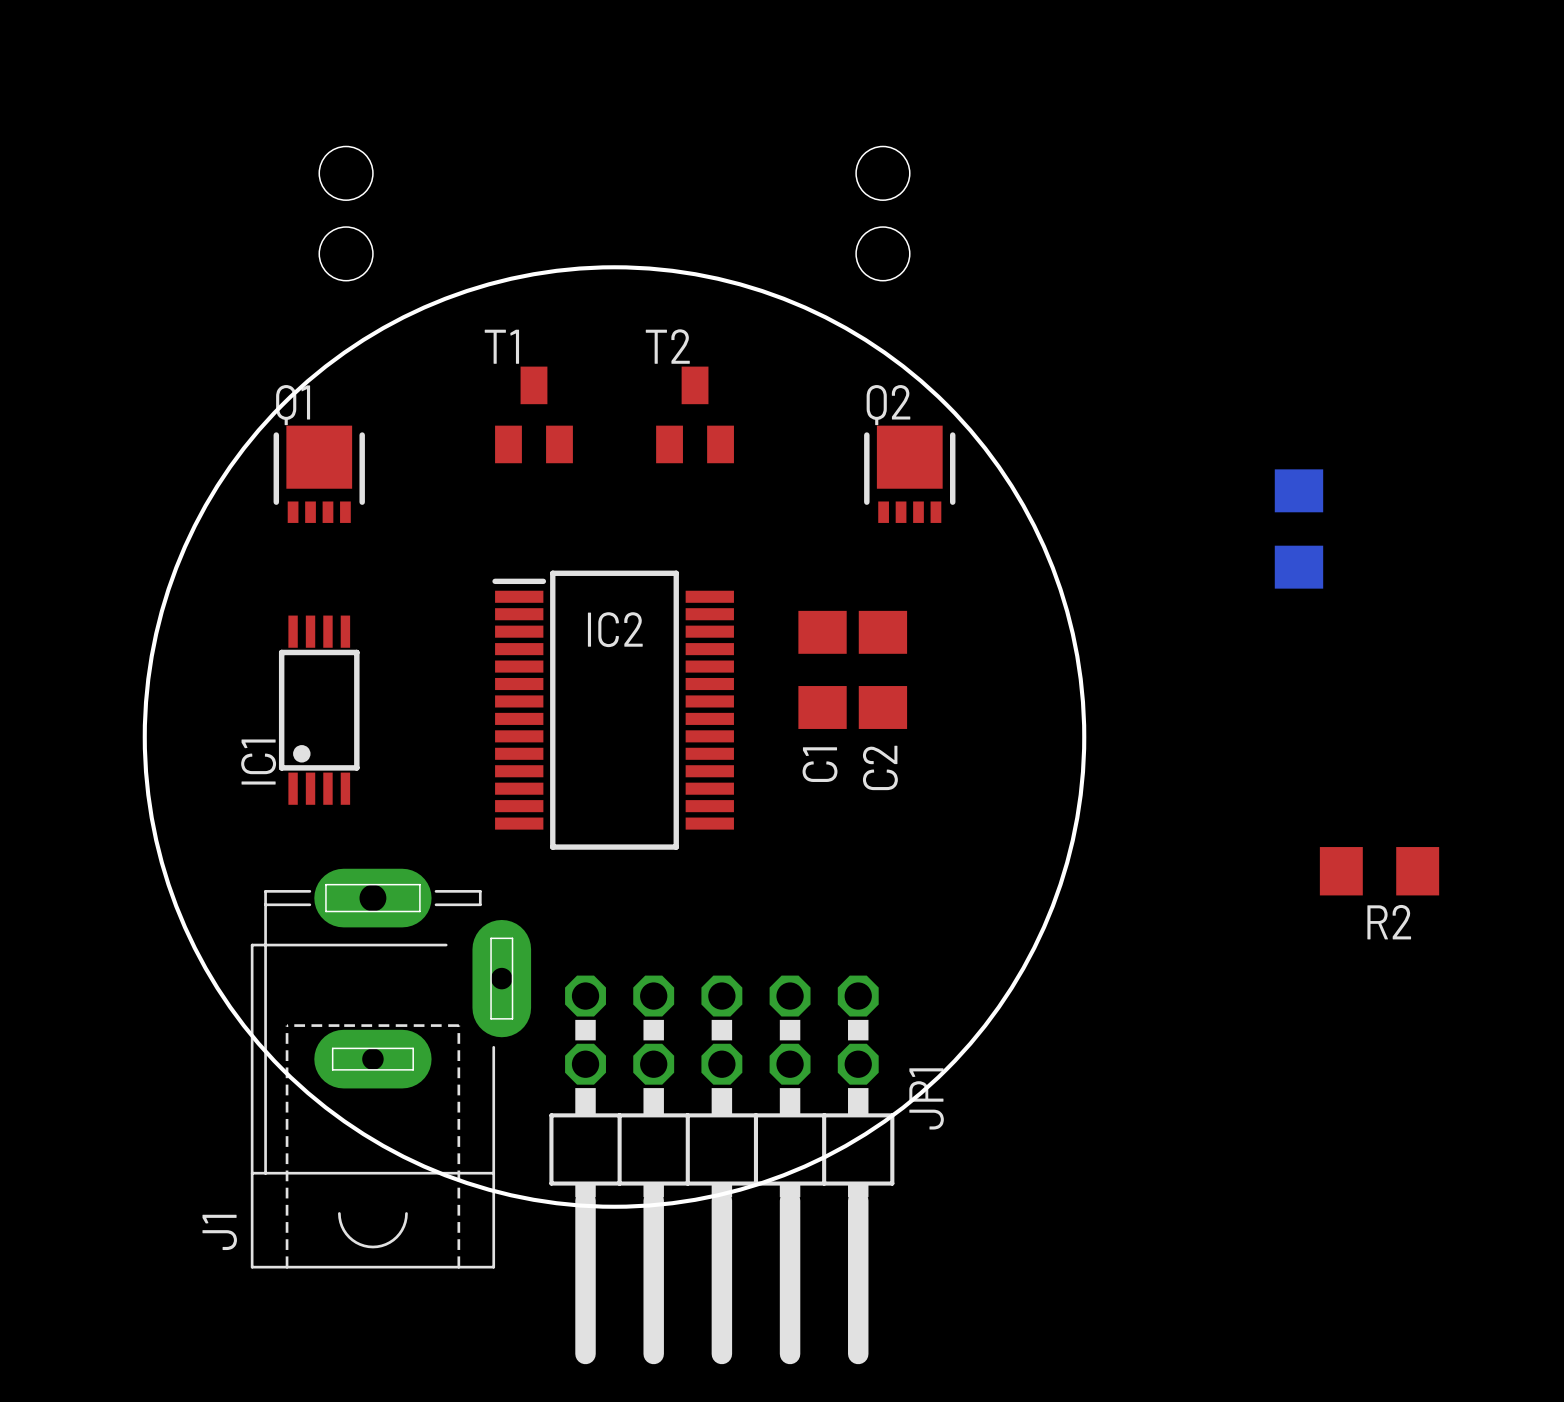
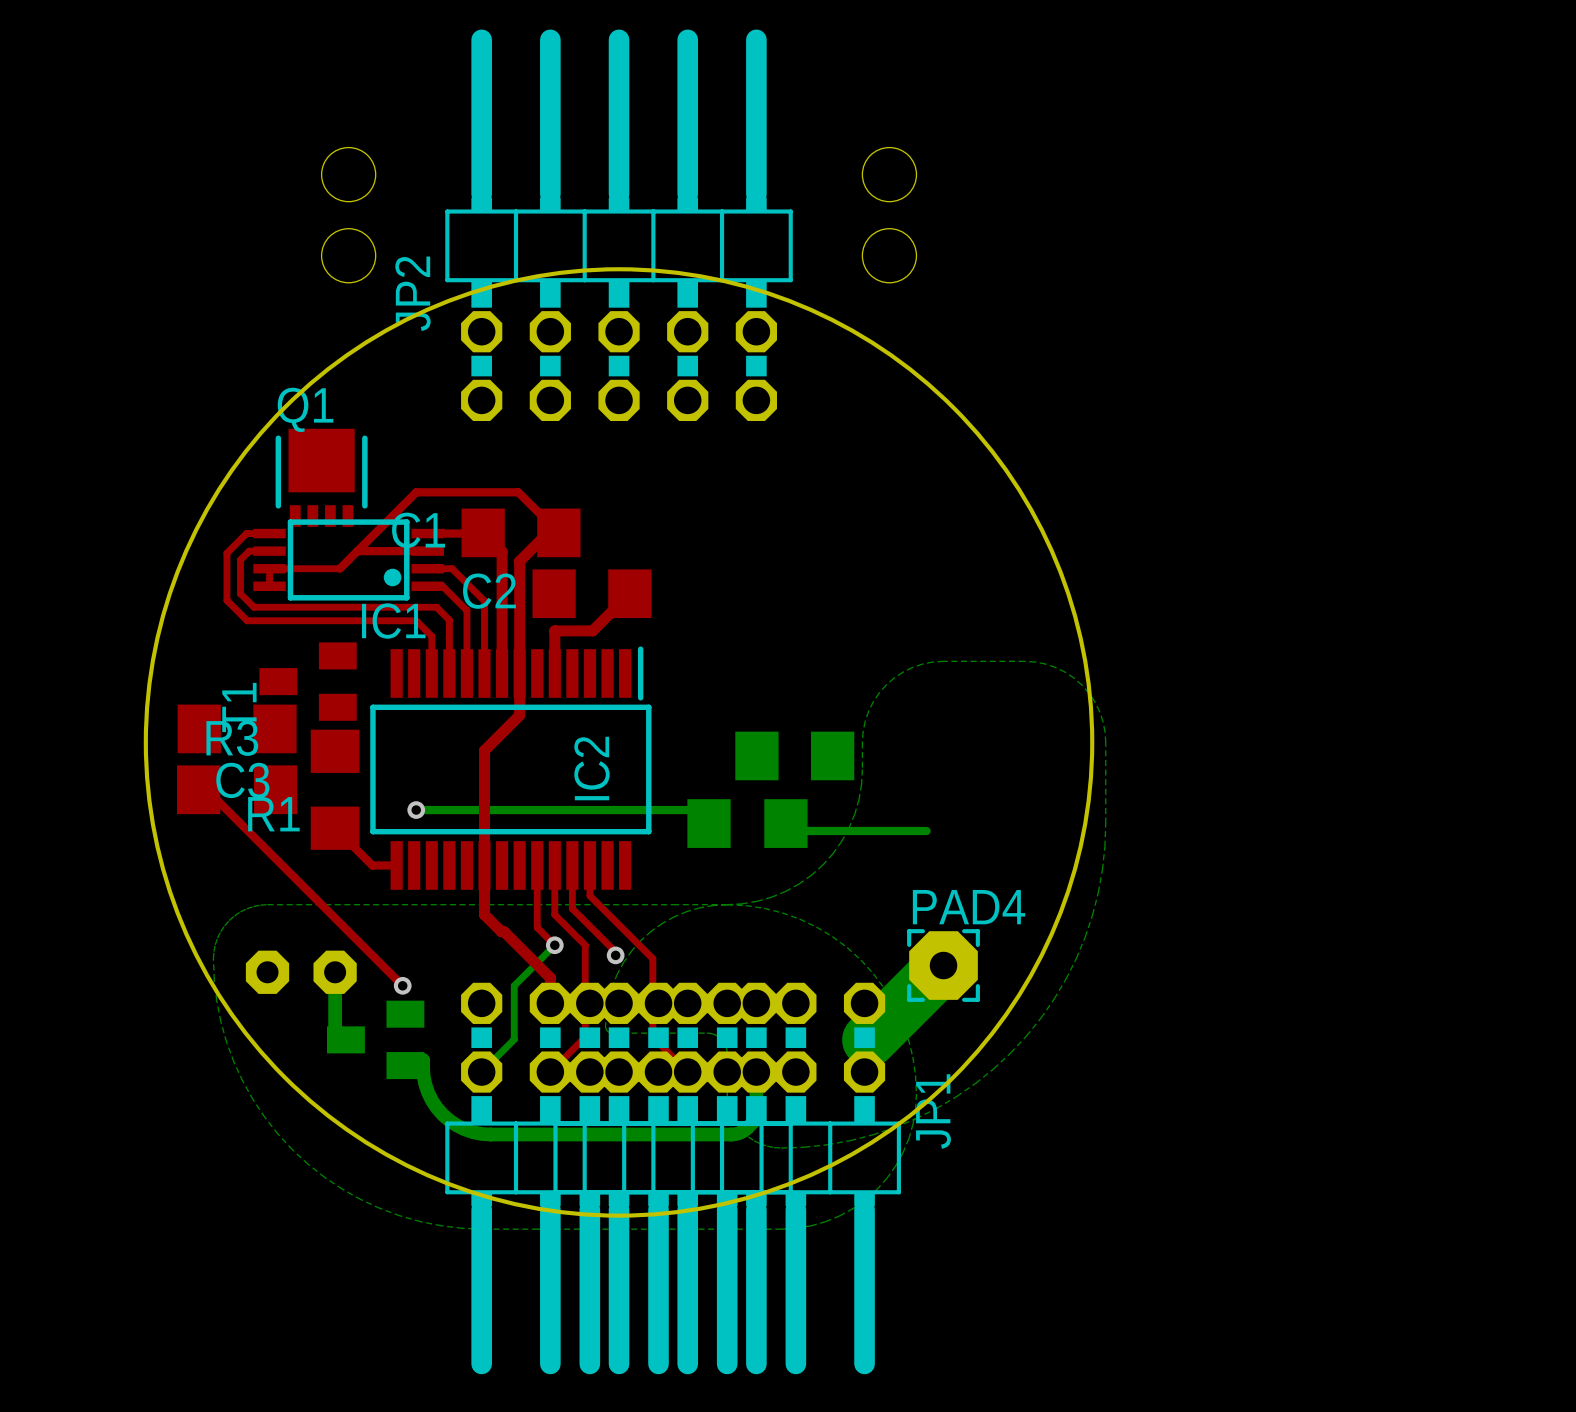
JP2: none -> (619, 225)
T1 rotation: 0° (533, 414) -> 90° counterclockwise (308, 681)
T1 position: (533, 414) -> (308, 681)
T2: (695, 414) -> none
Q2: (909, 474) -> none
part: (1298, 528) -> none
top track: none -> (269, 533) (246, 533) (226, 553) (226, 600) (247, 620) (416, 620) (431, 636) (431, 673)
top track: none -> (427, 533) (483, 532) (502, 551) (502, 673)
top track: none -> (269, 551) (249, 551) (240, 559) (240, 593) (254, 607) (436, 607) (449, 620) (449, 673)
top track: none -> (357, 551) (427, 551)
top track: none -> (427, 568) (452, 568) (484, 601) (484, 673)
top track: none -> (269, 586) (269, 568) (339, 568) (416, 492) (518, 492) (558, 532) (548, 532) (519, 561) (519, 715) (484, 750) (484, 914) (550, 977) (550, 1003)
top track: none -> (427, 586) (442, 586) (466, 610) (466, 673)
top track: none -> (629, 593) (592, 630) (554, 630) (554, 673)
bottom zone outline: none -> (943, 661) (1024, 661) (1045, 664) (1074, 678) (1094, 701) (1105, 731) (1104, 846) (1098, 892) (1085, 936) (1066, 979) (1041, 1018) (1010, 1053) (993, 1068) (956, 1096) (916, 1118) (894, 1127) (850, 1140) (804, 1147) (774, 1147) (760, 1143) (743, 1132) (731, 1114) (727, 1101) (727, 1050) (721, 1039) (714, 1034) (706, 1033) (609, 1032) (605, 1027) (606, 1012) (612, 986) (624, 961) (632, 950) (651, 931) (662, 923) (674, 916) (700, 907) (742, 903) (771, 897) (799, 883) (822, 865) (841, 841) (854, 814) (861, 784) (863, 731) (873, 701) (886, 685) (902, 672) (922, 664) (943, 661)
C1 rotation: 0° (822, 669) -> 90° clockwise (521, 532)
C1 position: (822, 669) -> (521, 532)
C2 rotation: 0° (882, 669) -> 90° clockwise (591, 593)
C2 position: (882, 669) -> (591, 593)
IC1 rotation: 0° (319, 710) -> 90° counterclockwise (348, 559)
IC1 position: (319, 710) -> (348, 559)
IC2 rotation: 0° (613, 710) -> 90° clockwise (510, 768)
C3: none -> (237, 728)
part: none -> (794, 755)
top track: none -> (198, 789) (206, 789) (402, 985)
R3: none -> (237, 789)
R1: none -> (335, 789)
bottom track: none -> (416, 810) (695, 810) (709, 823)
via: none -> (416, 810)
bottom track: none -> (785, 823) (793, 831) (926, 831)
top track: none -> (335, 828) (372, 865) (396, 865)
top track: none -> (537, 865) (537, 927) (554, 945)
top track: none -> (554, 865) (554, 914) (585, 945) (585, 1037) (550, 1072)
top track: none -> (572, 865) (572, 908) (615, 952) (615, 955)
top track: none -> (589, 865) (589, 895) (652, 958) (652, 1037) (687, 1072)
R2 side: top (1379, 871) -> bottom (747, 823)
bottom zone outline: none -> (267, 904) (246, 908) (234, 915) (220, 931) (215, 944) (213, 958) (216, 1001) (226, 1042) (234, 1062) (253, 1100) (265, 1117) (292, 1149) (324, 1177) (342, 1189) (380, 1208) (400, 1215) (441, 1225) (483, 1229) (796, 1228) (825, 1221) (853, 1208) (865, 1199) (886, 1178) (903, 1152) (908, 1138) (915, 1109) (915, 1075) (908, 1039) (894, 1004) (884, 988) (861, 960) (832, 936) (799, 919) (764, 908) (727, 904) (267, 904)
bottom track: none -> (554, 945) (514, 985) (514, 1039) (481, 1072)
via: none -> (554, 945)
via: none -> (615, 955)
bottom track: none -> (943, 965) (869, 1039)
PAD4: none -> (943, 965)
part: none -> (267, 972)
bottom track: none -> (335, 972) (335, 1029) (345, 1039)
part: none -> (335, 972)
via: none -> (402, 985)
part: none -> (375, 1039)
bottom track: none -> (405, 1065) (409, 1060) (423, 1060) (423, 1075) (428, 1092) (442, 1114) (464, 1129) (490, 1134) (737, 1133) (745, 1129) (756, 1117) (756, 1072)
J1: (390, 1068) -> none
part: none -> (619, 1178)

